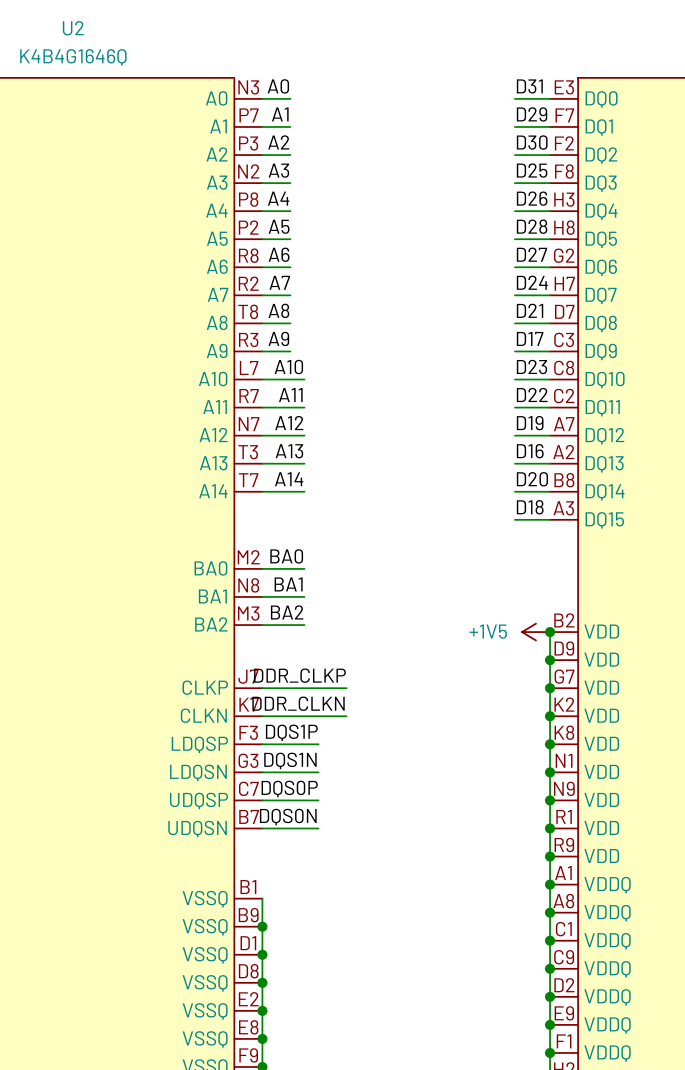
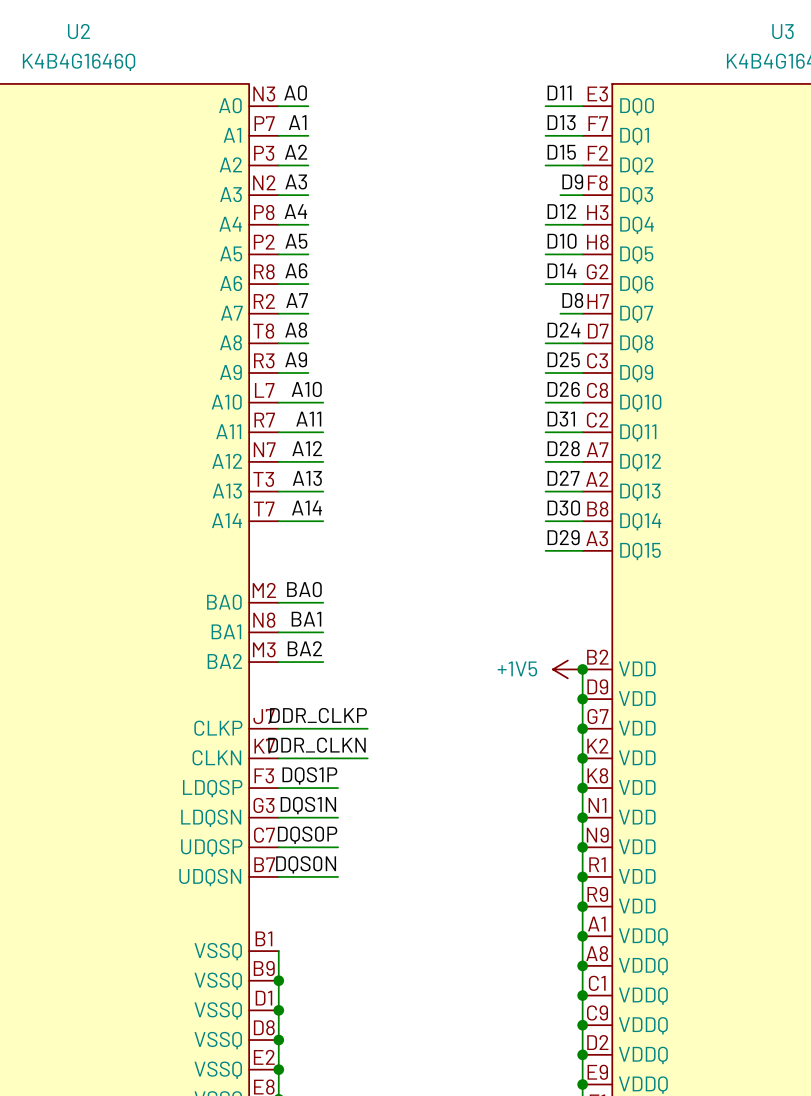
label: D31 (529, 86) -> D11 (559, 92)
label: D29 (532, 114) -> D13 (561, 122)
label: D30 (532, 142) -> D15 (561, 152)
label: D25 (532, 170) -> none
label: none -> D9 (572, 181)
wire: (514, 183) (528, 183) -> none
label: D26 (532, 198) -> D12 (561, 211)
label: D28 (532, 226) -> D10 (562, 241)
label: D27 (531, 254) -> D14 (562, 270)
label: D24 (532, 282) -> none
label: none -> D8 (572, 300)
wire: (514, 295) (528, 295) -> none
label: D21 (530, 310) -> D24 (563, 330)
label: D17 (530, 338) -> D25 (563, 359)
label: D23 (531, 367) -> D26 (563, 389)
label: D22 (532, 394) -> D31 (561, 419)
label: D19 (530, 423) -> D28 (563, 448)
label: D16 (530, 451) -> D27 (563, 478)
label: D20 (532, 479) -> D30 (563, 508)
label: D18 (530, 507) -> D29 (563, 537)

